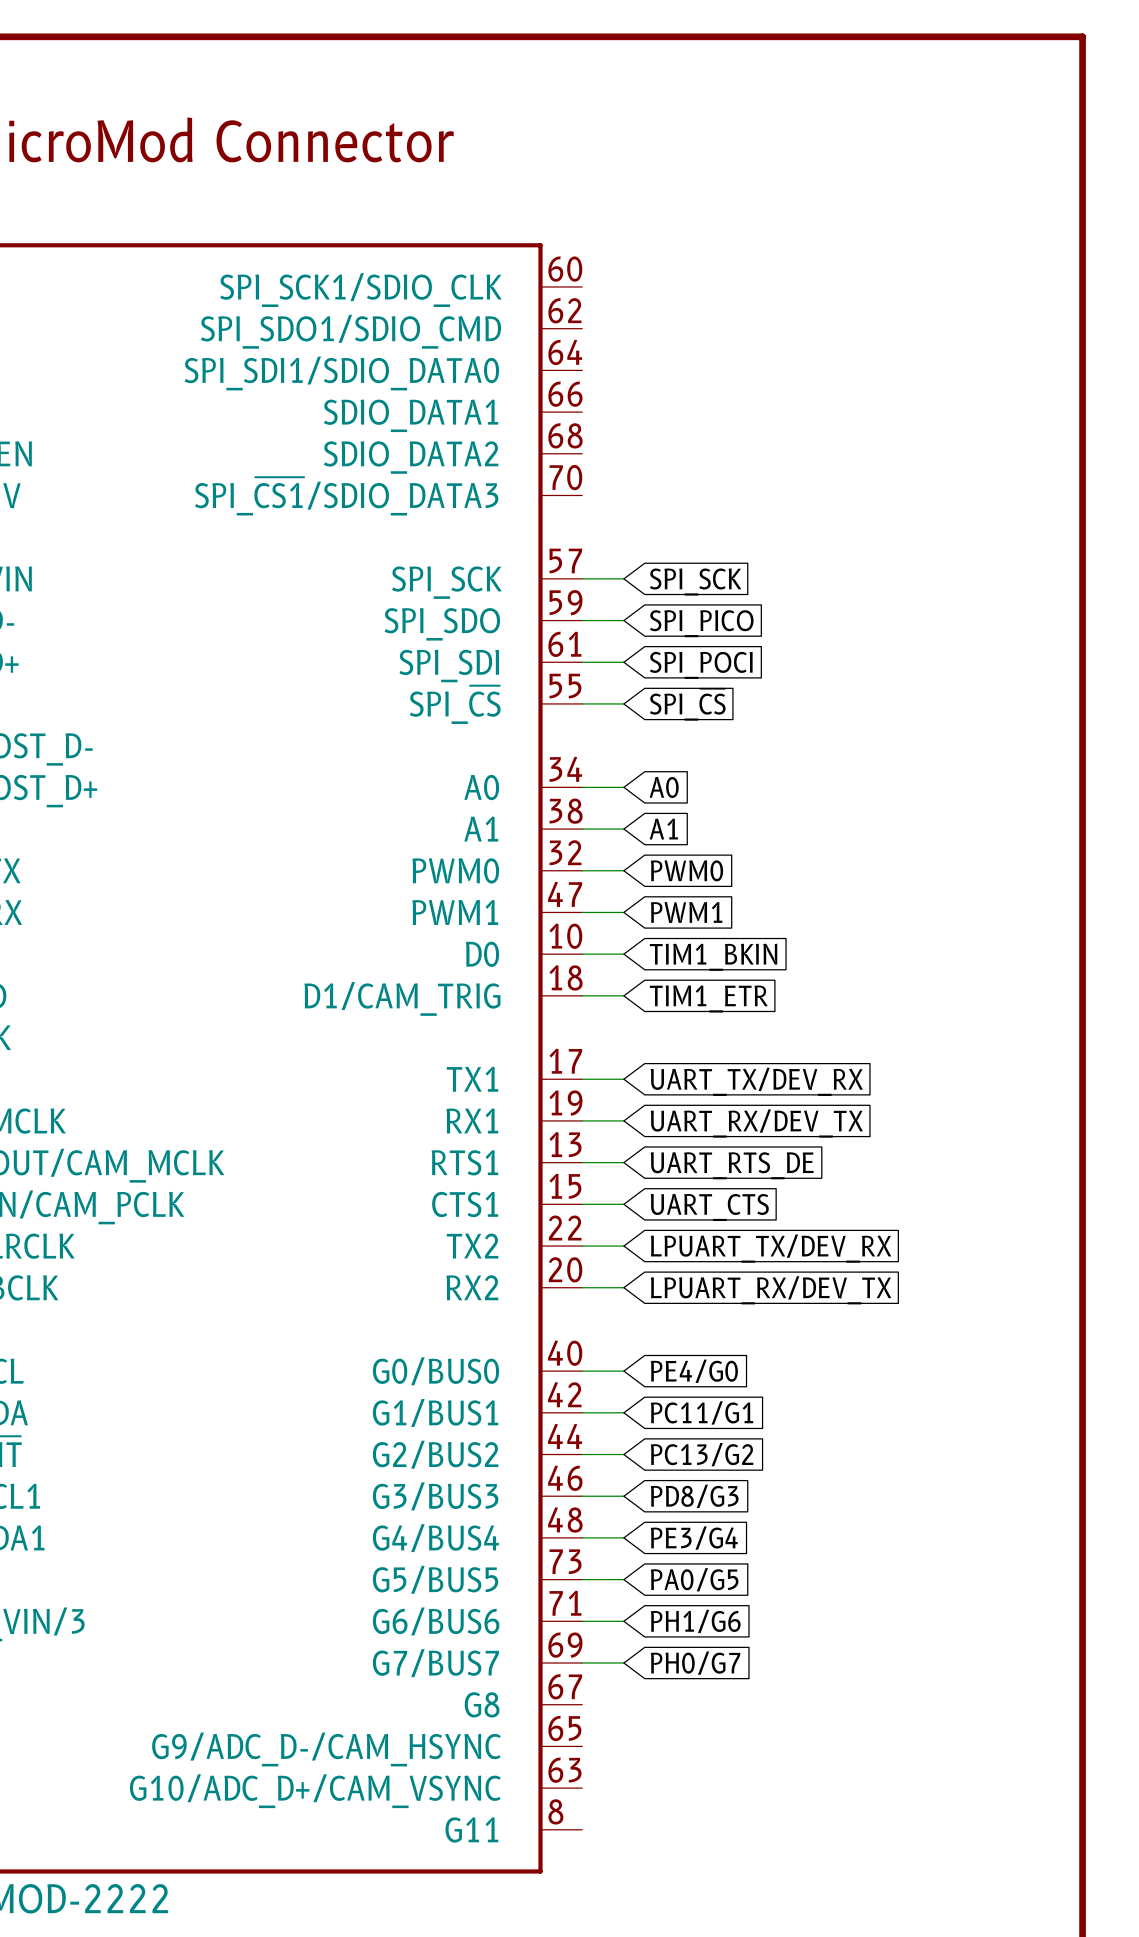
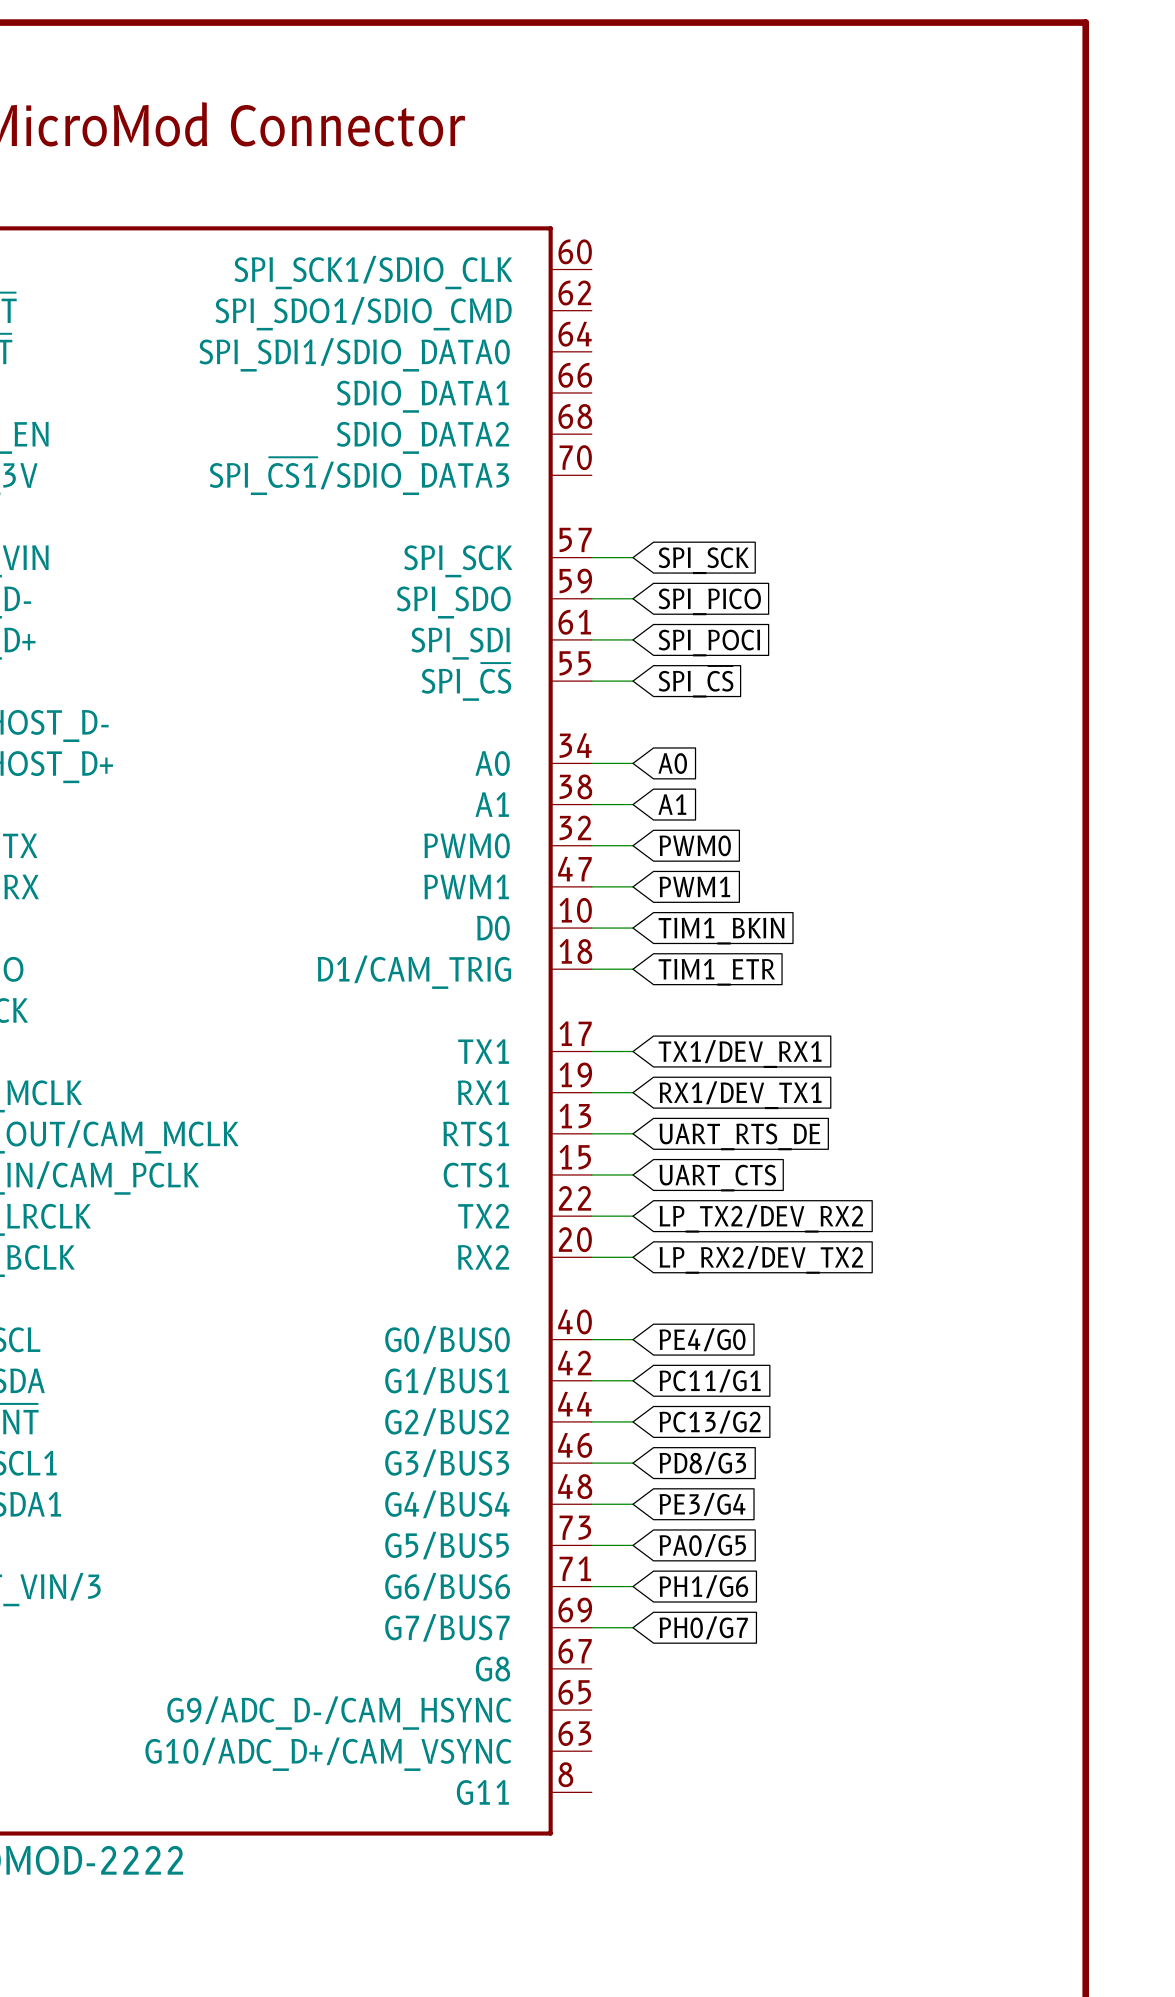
global label: UART_TX/DEV_RX (756, 1081) -> TX1/DEV_RX1 (740, 1054)
global label: UART_RX/DEV_TX (756, 1123) -> RX1/DEV_TX1 (740, 1095)
global label: LPUART_TX/DEV_RX (771, 1248) -> LP_TX2/DEV_RX2 (761, 1218)
global label: LPUART_RX/DEV_TX (771, 1290) -> LP_RX2/DEV_TX2 (761, 1259)

